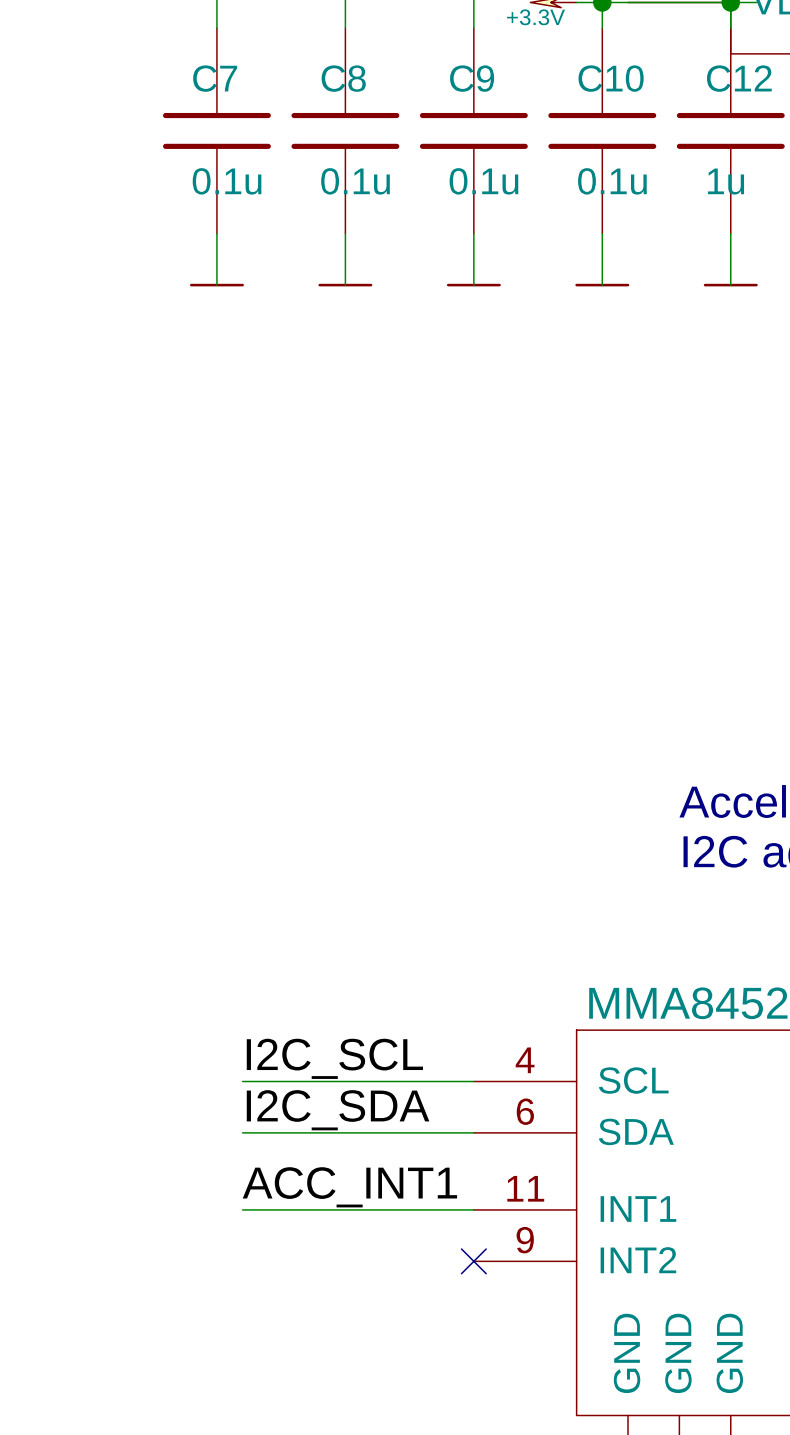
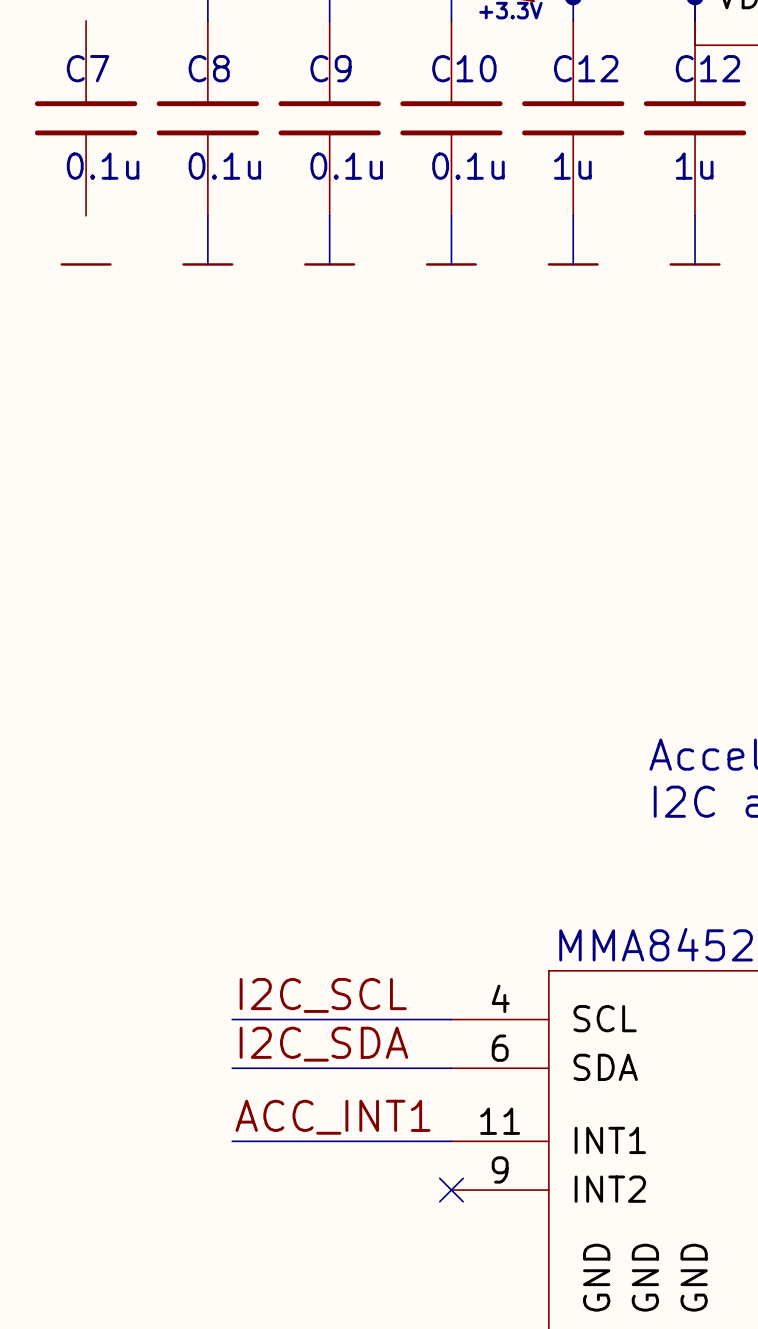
C7 name: C7 (215, 78) -> C8 (209, 68)
C8 name: C8 (343, 78) -> C9 (331, 68)
C9 name: C9 (472, 78) -> C10 (464, 68)
C10 name: C10 (611, 78) -> C12 (586, 68)
C7: none -> 0.1u (86, 118)
C10 value: 0.1u (612, 181) -> 1u (572, 166)
power symbol: none -> (86, 264)

